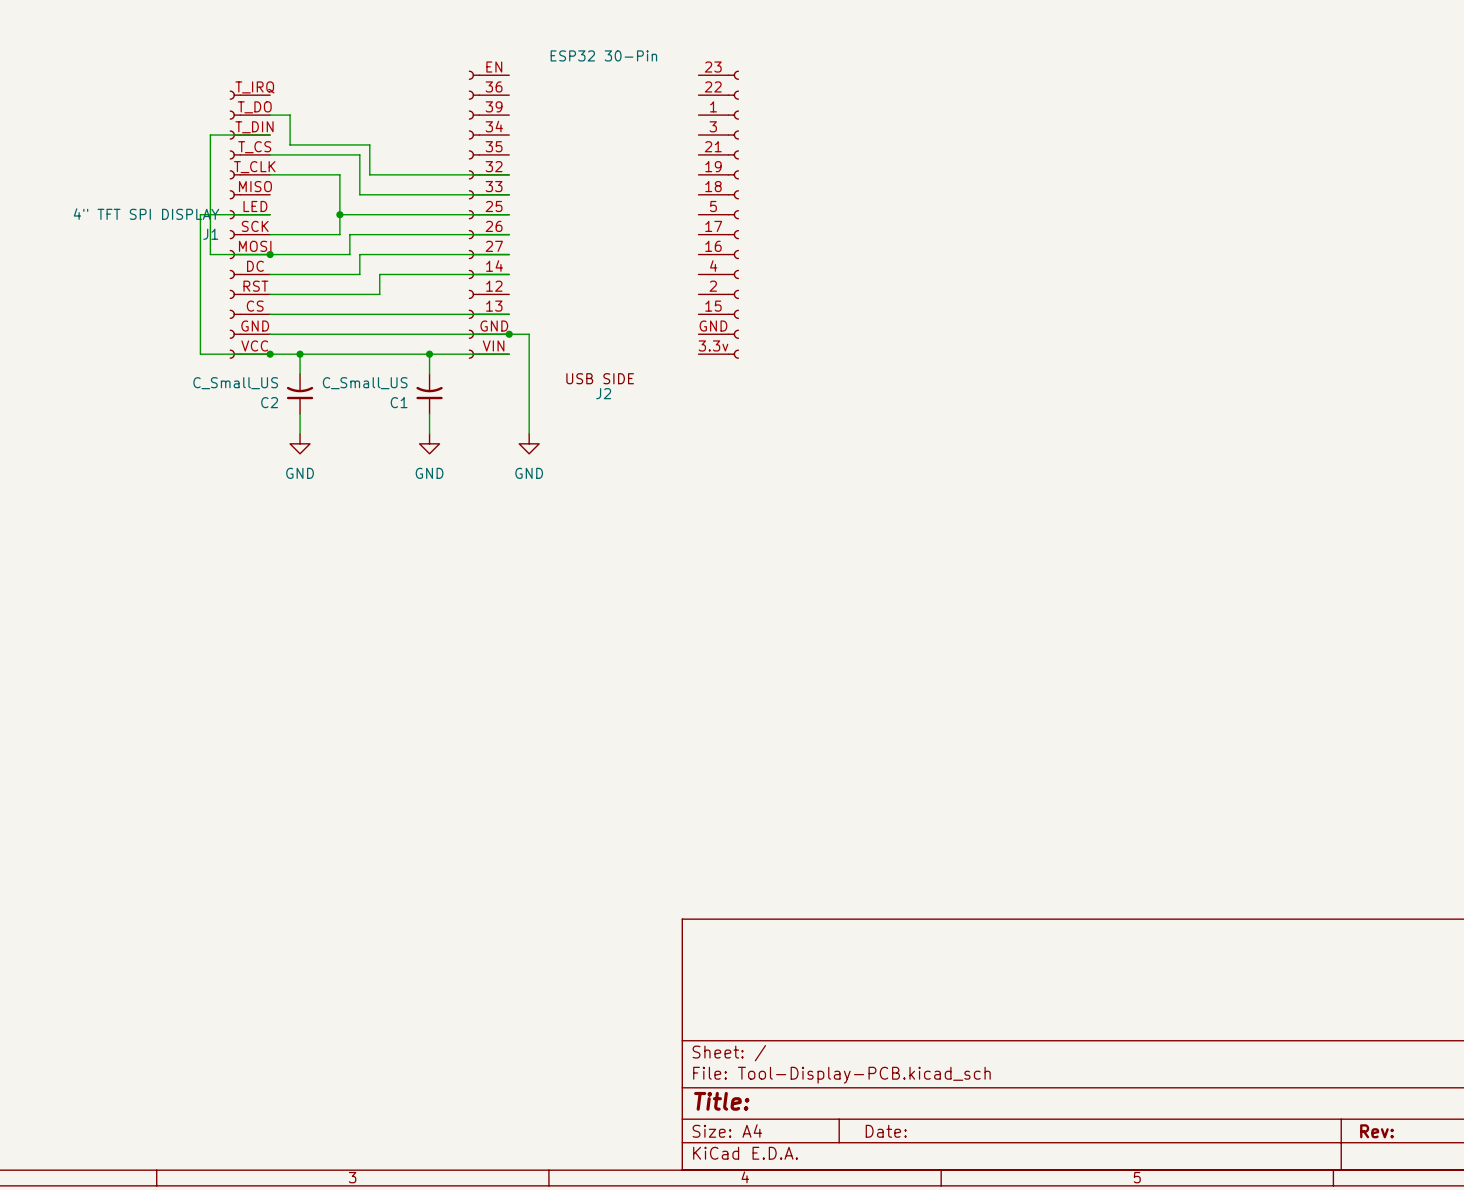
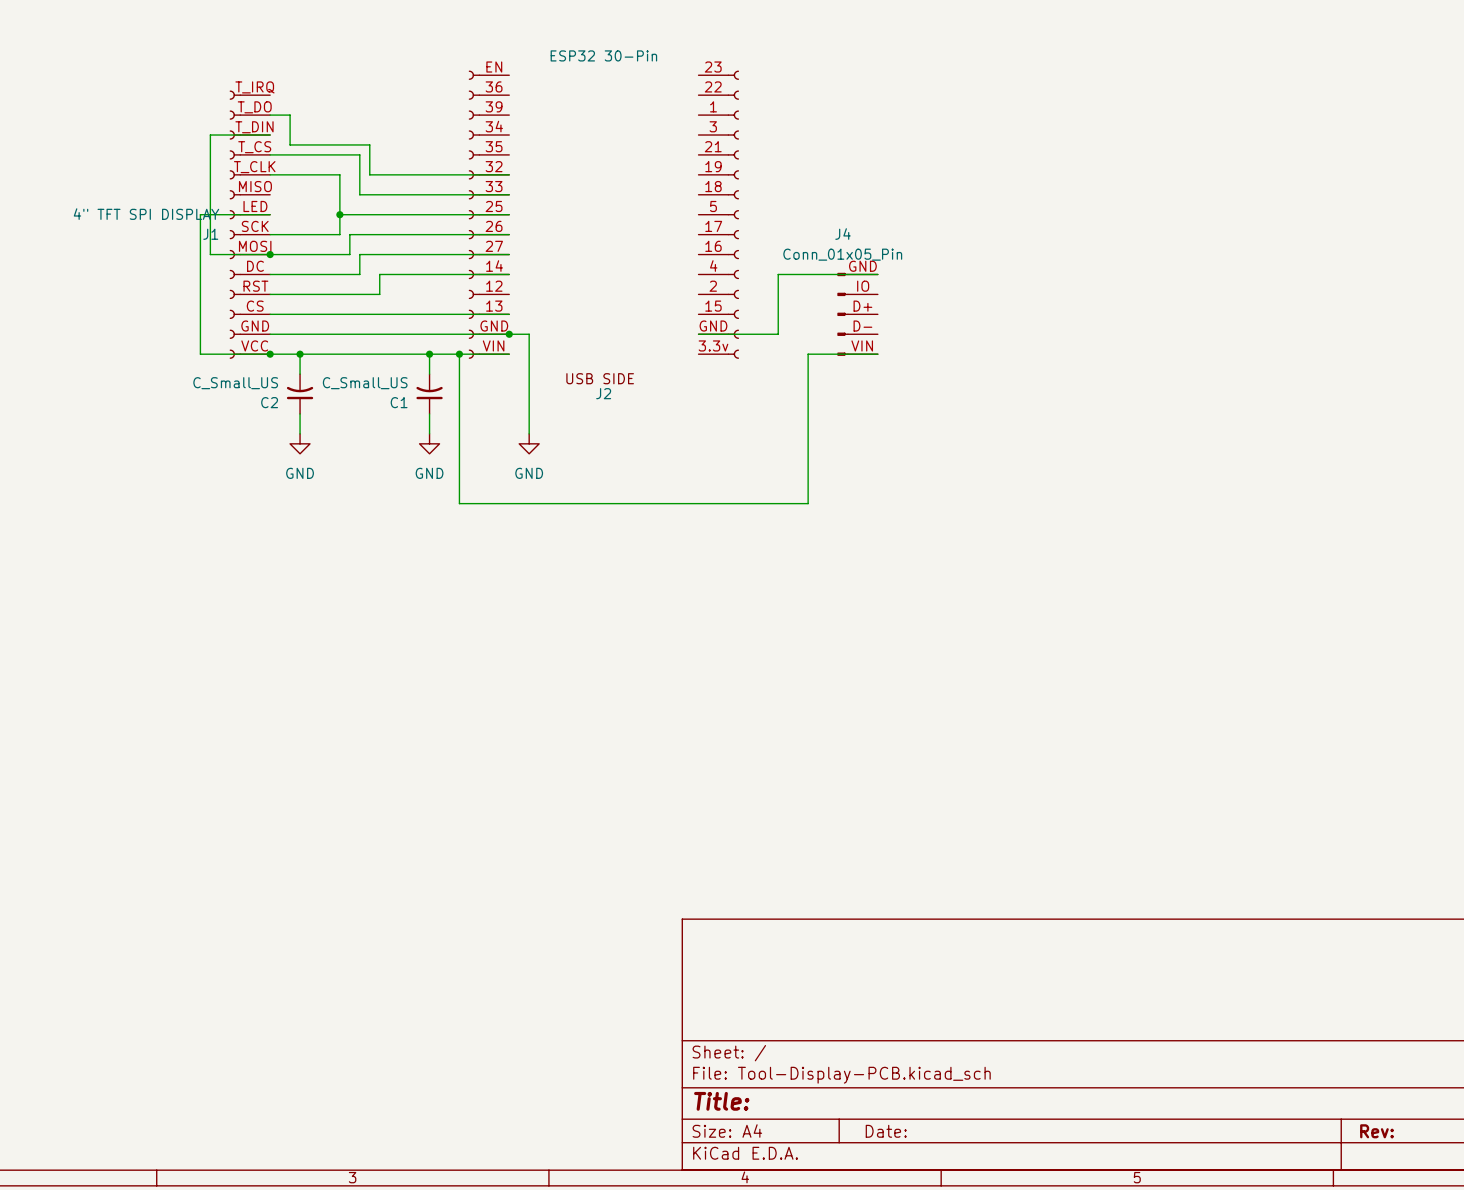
wire: none -> (877, 274) (778, 274) (778, 334) (698, 334)
J4: none -> Conn_01x05_Pin (857, 314)
wire: none -> (459, 354) (459, 503) (808, 503) (808, 354) (877, 354)
junction: none -> (459, 354)

